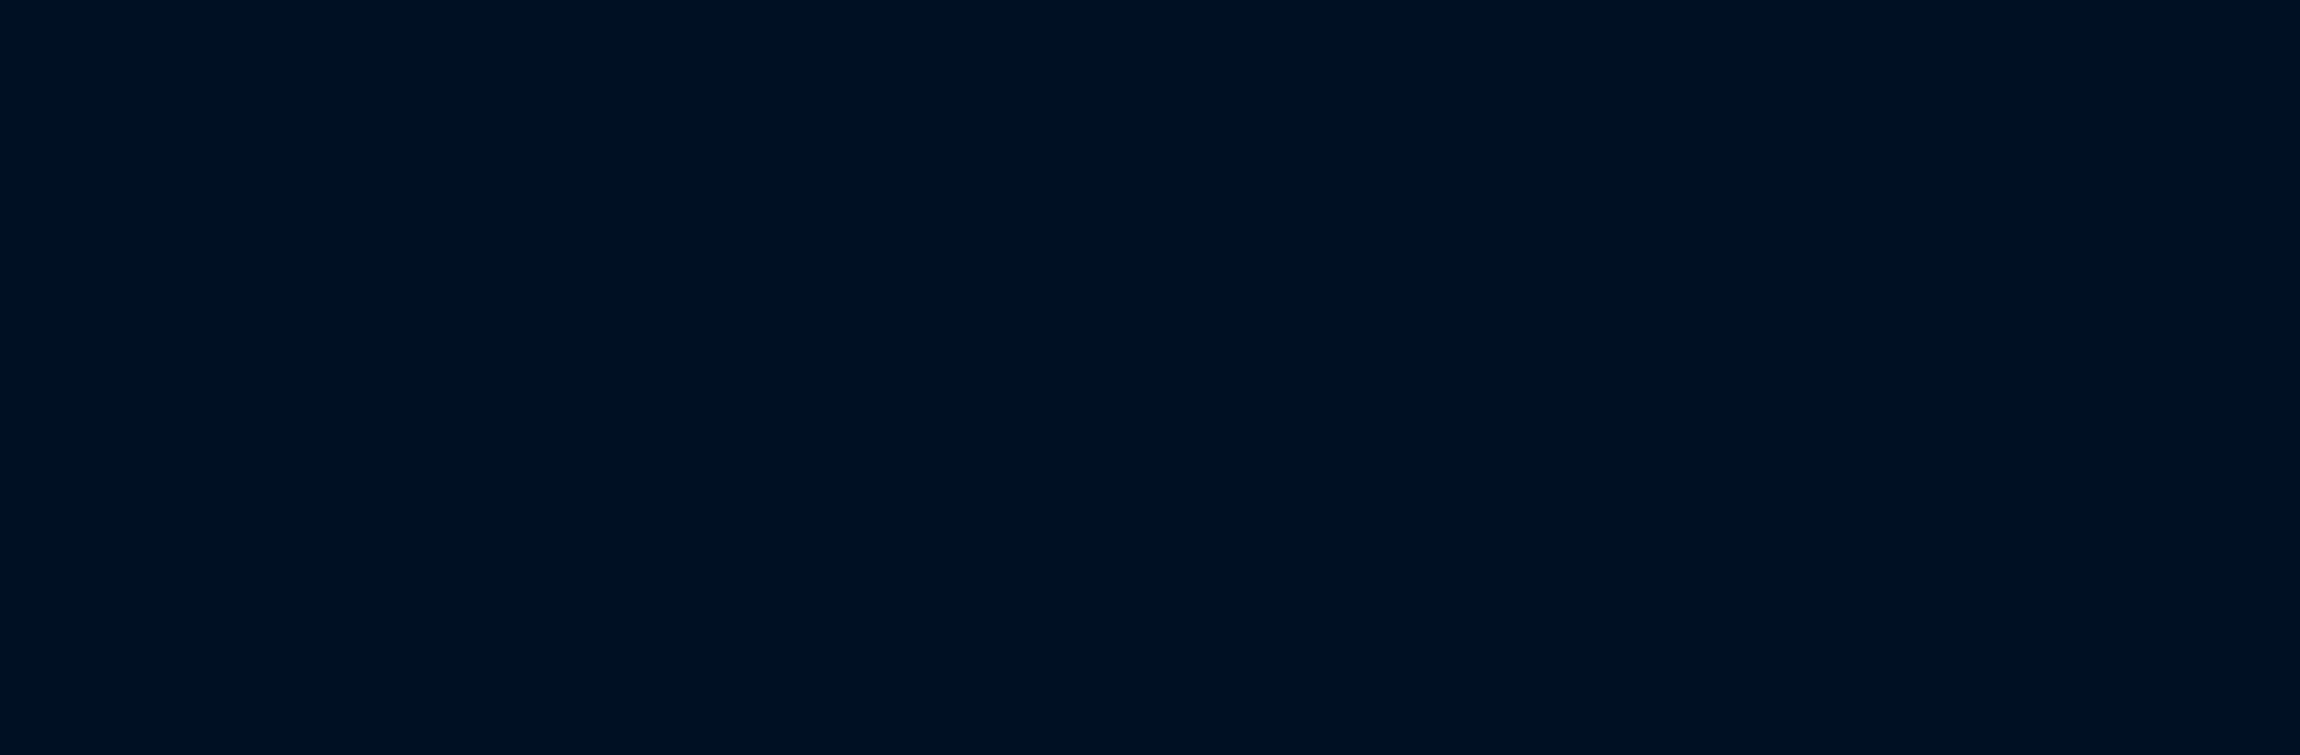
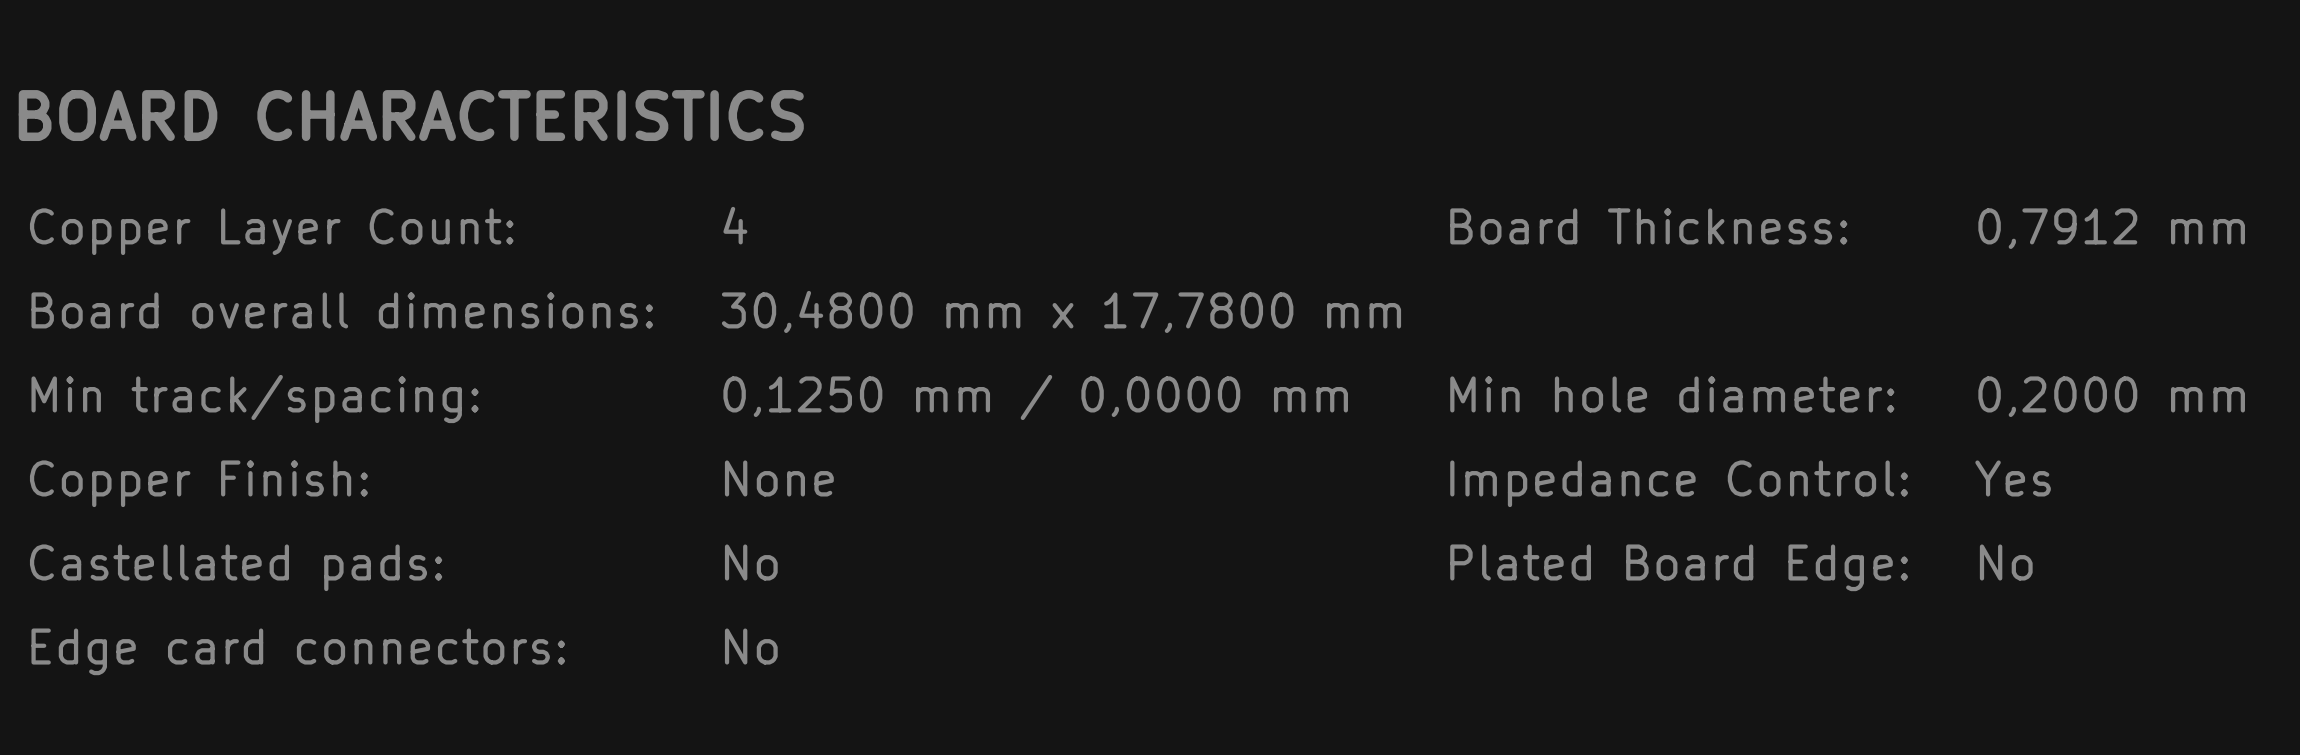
text: none -> BOARD CHARACTERISTICS (411, 115)
text: none -> 4 (735, 225)
text: none -> Board Thickness: (1648, 226)
text: none -> 0,7912 mm (2111, 228)
text: none -> Copper Layer Count: (271, 231)
text: none -> Board overall dimensions: (342, 310)
text: none -> 30,4800 mm x 17,7800 mm (1061, 311)
text: none -> Min hole diameter: (1672, 394)
text: none -> 0,2000 mm (2111, 396)
text: none -> 0,1250 mm / 0,0000 mm (1035, 397)
text: none -> Min track/spacing: (255, 398)
text: none -> None (779, 478)
text: none -> Yes (2013, 478)
text: none -> Copper Finish: (198, 483)
text: none -> Impedance Control: (1679, 483)
text: none -> No (751, 562)
text: none -> No (2006, 562)
text: none -> Castellated pads: (236, 567)
text: none -> Plated Board Edge: (1679, 567)
text: none -> No (751, 646)
text: none -> Edge card connectors: (298, 651)

